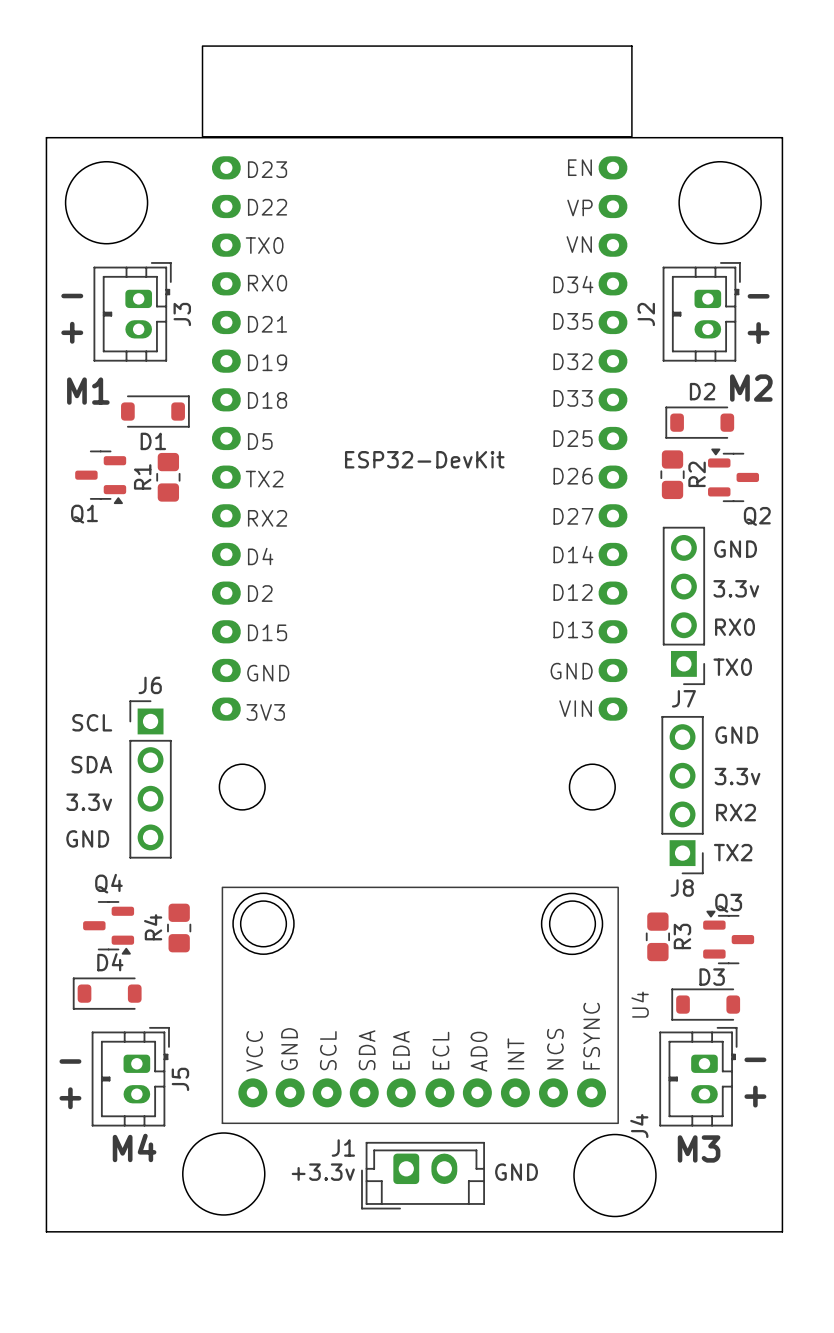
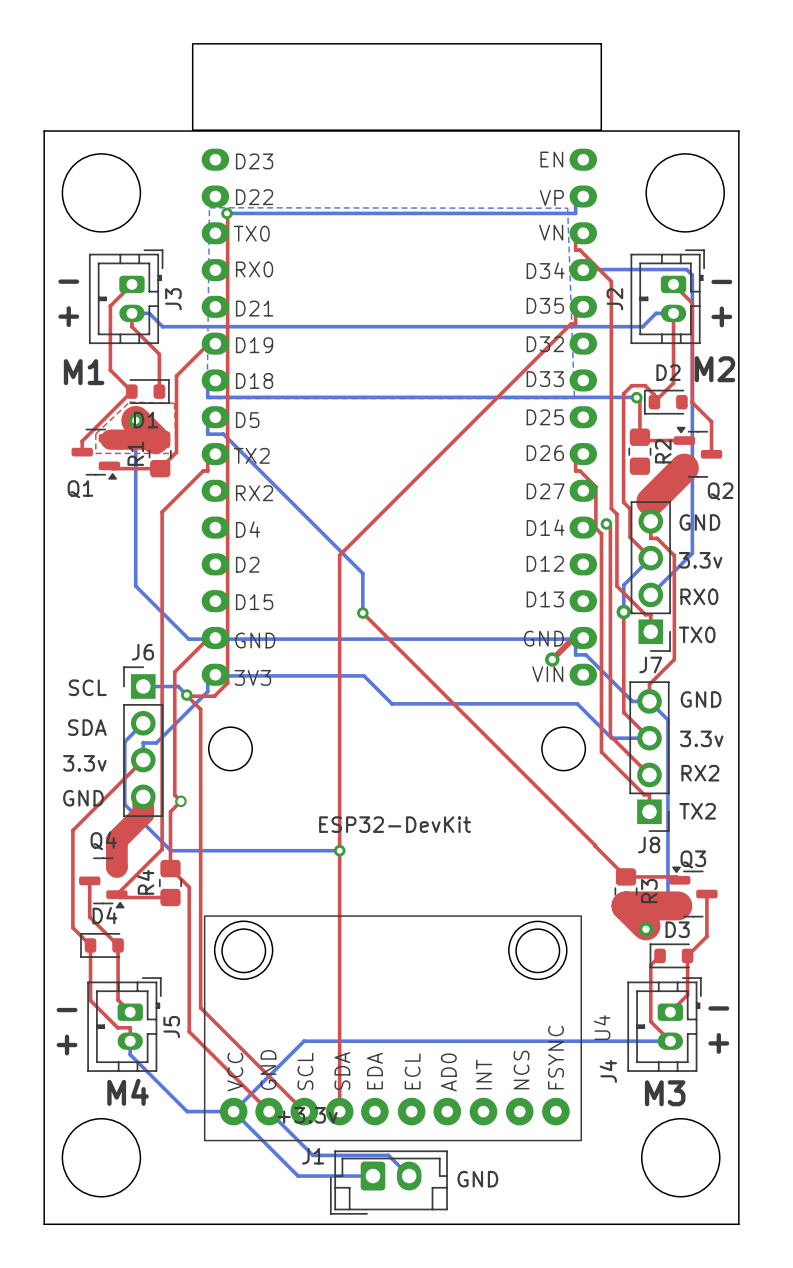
board edge: (776, 137) (782, 137) (782, 1231) (46, 1231) -> (738, 131) (738, 1224) (44, 1224) (44, 1172)
bottom track: none -> (575, 197) (575, 213) (226, 213)
bottom zone outline: none -> (209, 207) (567, 208) (574, 398) (207, 398) (209, 207)
top track: none -> (226, 213) (227, 683) (214, 696) (187, 696) (200, 709) (200, 1007) (304, 1111)
via: none -> (226, 213)
top track: none -> (575, 234) (575, 250) (580, 250) (611, 281) (611, 508) (616, 514) (616, 586) (645, 614) (650, 614) (650, 631)
bottom track: none -> (575, 271) (577, 269) (686, 269) (692, 275) (692, 553) (650, 594)
top track: none -> (131, 284) (110, 305) (110, 370) (131, 391) (82, 441) (82, 452)
top track: none -> (673, 284) (692, 303) (691, 402) (711, 421) (711, 454)
top track: none -> (575, 308) (575, 323) (571, 323) (339, 555) (339, 1111)
top track: none -> (131, 313) (131, 326) (159, 354) (159, 391)
bottom track: none -> (131, 313) (149, 313) (162, 326) (642, 326) (656, 313) (673, 313)
top track: none -> (673, 313) (673, 383) (654, 402) (654, 394) (645, 385) (631, 385) (623, 393) (623, 502) (630, 508) (630, 537) (650, 558)
top track: none -> (207, 344) (176, 376) (176, 452) (160, 468) (112, 468) (109, 465)
D1 footprint: [121, 395, 190, 428] -> [126, 379, 170, 405]
bottom track: none -> (207, 381) (207, 397) (639, 397)
D2 footprint: [665, 406, 735, 439] -> [643, 389, 688, 415]
top track: none -> (636, 397) (639, 400) (639, 437) (643, 440) (684, 440)
via: none -> (636, 397)
top zone outline: none -> (129, 402) (95, 433) (95, 453) (176, 453) (174, 403) (129, 402)
bottom track: none -> (207, 418) (207, 434) (223, 434) (362, 573) (362, 613)
top track: none -> (135, 420) (155, 439) (160, 439) (110, 439) (109, 438)
bottom track: none -> (135, 420) (135, 586) (188, 639) (575, 639) (575, 654) (585, 654) (632, 701) (649, 701) (667, 719) (667, 907) (646, 929) (646, 927)
via: none -> (135, 420)
text: ESP32-DevKit (424, 459) -> none
top track: none -> (207, 455) (207, 470) (203, 470) (162, 512) (162, 849) (116, 894) (119, 897) (170, 897)
top track: none -> (575, 455) (575, 470) (580, 470) (595, 486) (595, 528) (601, 533) (601, 752) (644, 794) (649, 794) (649, 811)
top track: none -> (684, 468) (650, 501) (650, 538) (657, 538) (674, 555) (674, 659) (649, 684) (649, 701)
top track: none -> (606, 523) (610, 527) (610, 735) (649, 774)
via: none -> (606, 523)
bottom track: none -> (650, 558) (623, 585) (623, 611)
top track: none -> (623, 611) (623, 712) (649, 738)
via: none -> (623, 611)
top track: none -> (362, 613) (626, 876) (676, 876) (679, 880)
via: none -> (362, 613)
top track: none -> (207, 639) (174, 672) (174, 795) (180, 801) (170, 811) (170, 868) (189, 887) (189, 1031) (269, 1111)
top track: none -> (575, 638) (572, 639) (552, 659)
via: none -> (552, 659)
bottom track: none -> (143, 686) (178, 686) (186, 695)
via: none -> (186, 695)
bottom track: none -> (143, 723) (124, 741) (124, 804) (170, 850) (339, 850)
bottom track: none -> (649, 738) (611, 738) (577, 703) (391, 703) (364, 675) (207, 675) (207, 691) (156, 743) (143, 743) (143, 760)
top track: none -> (143, 760) (72, 830) (72, 927) (90, 945) (90, 1000) (117, 1027) (130, 1027) (130, 1041)
top track: none -> (143, 796) (143, 813) (116, 840) (116, 867)
via: none -> (180, 801)
text: none -> ESP32-DevKit (395, 824)
via: none -> (339, 850)
round board edge position: (263, 923) -> (243, 950)
round board edge position: (572, 923) -> (537, 950)
top track: none -> (89, 880) (89, 917) (118, 945) (118, 1000) (130, 1012)
top track: none -> (706, 894) (706, 936) (687, 955) (687, 994) (670, 1012)
top track: none -> (679, 907) (677, 905) (626, 905) (646, 925) (646, 929)
via: none -> (646, 929)
D4 footprint: [72, 977, 142, 1010] -> [80, 933, 124, 958]
D3 footprint: [671, 988, 741, 1021] -> [649, 943, 694, 969]
top track: none -> (660, 955) (650, 965) (650, 1021) (670, 1041)
U4 position: (420, 1005) -> (392, 1028)
bottom track: none -> (130, 1041) (130, 1054) (187, 1111) (233, 1111)
bottom track: none -> (670, 1041) (304, 1041) (233, 1111)
bottom track: none -> (233, 1111) (298, 1176) (372, 1176)
bottom track: none -> (269, 1111) (312, 1155) (388, 1155) (409, 1176)
text position: GND (516, 1172) -> GND (477, 1179)
round board edge position: (223, 1173) -> (101, 1157)
J1 position: (423, 1175) -> (388, 1182)
round board edge position: (614, 1175) -> (680, 1157)

